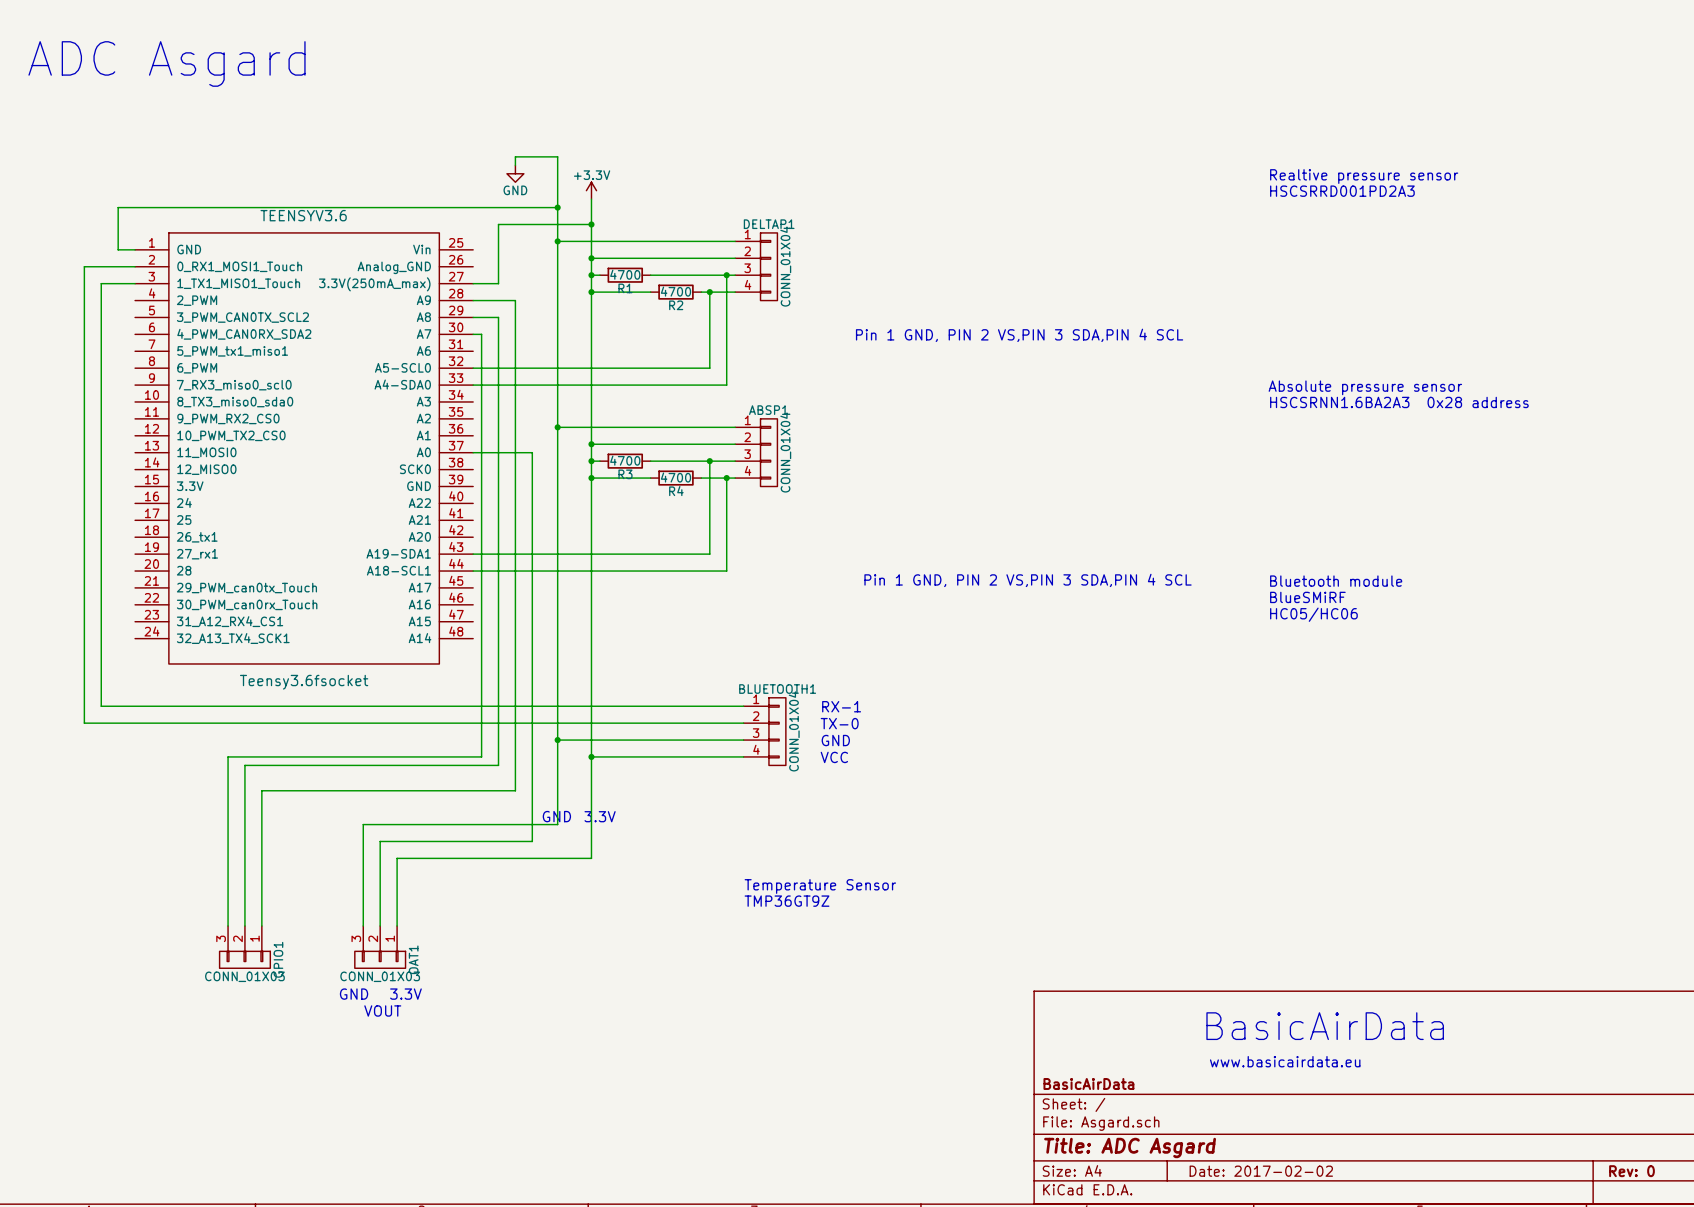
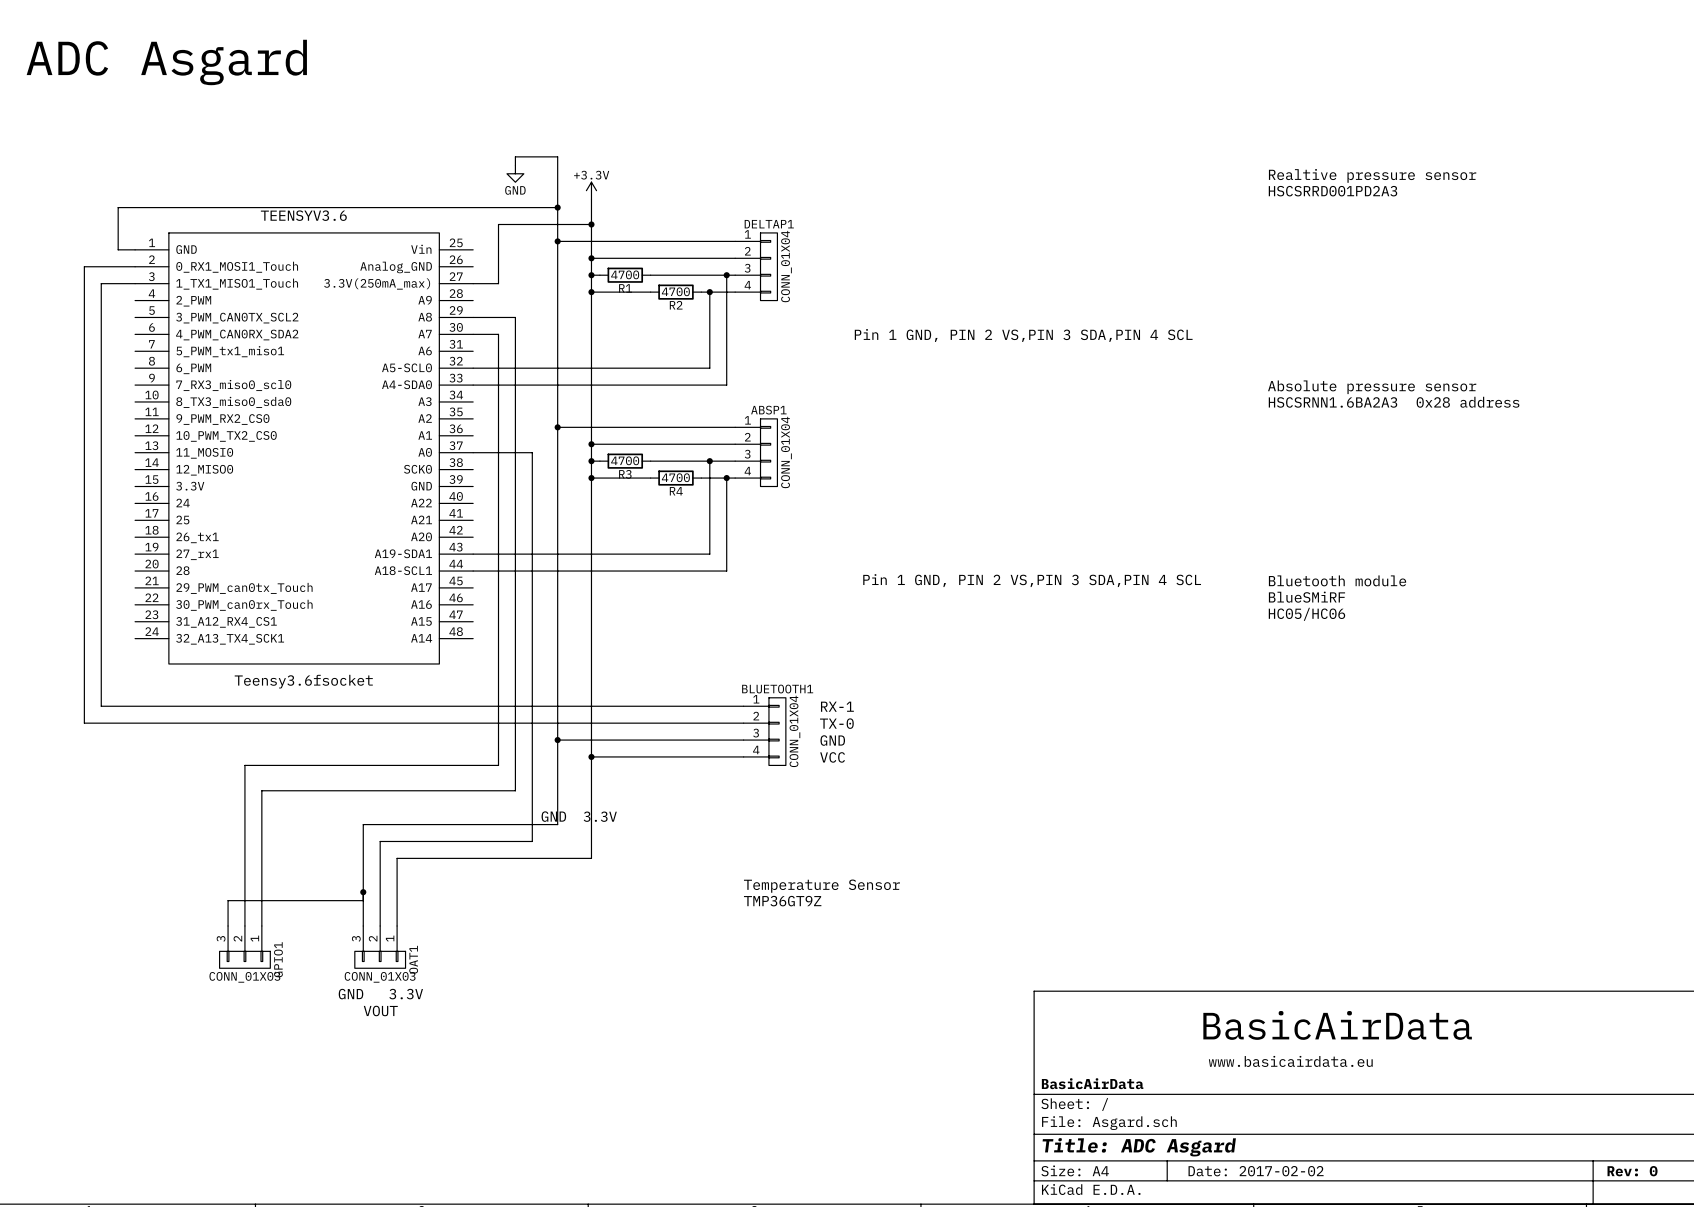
wire: (473, 300) (515, 300) (515, 317) -> (498, 317) (515, 317)
wire: (498, 317) (498, 334) -> (481, 334) (498, 334)
wire: (481, 334) (481, 756) (228, 756) (228, 900) -> (363, 900) (228, 900)
junction: none -> (363, 892)

